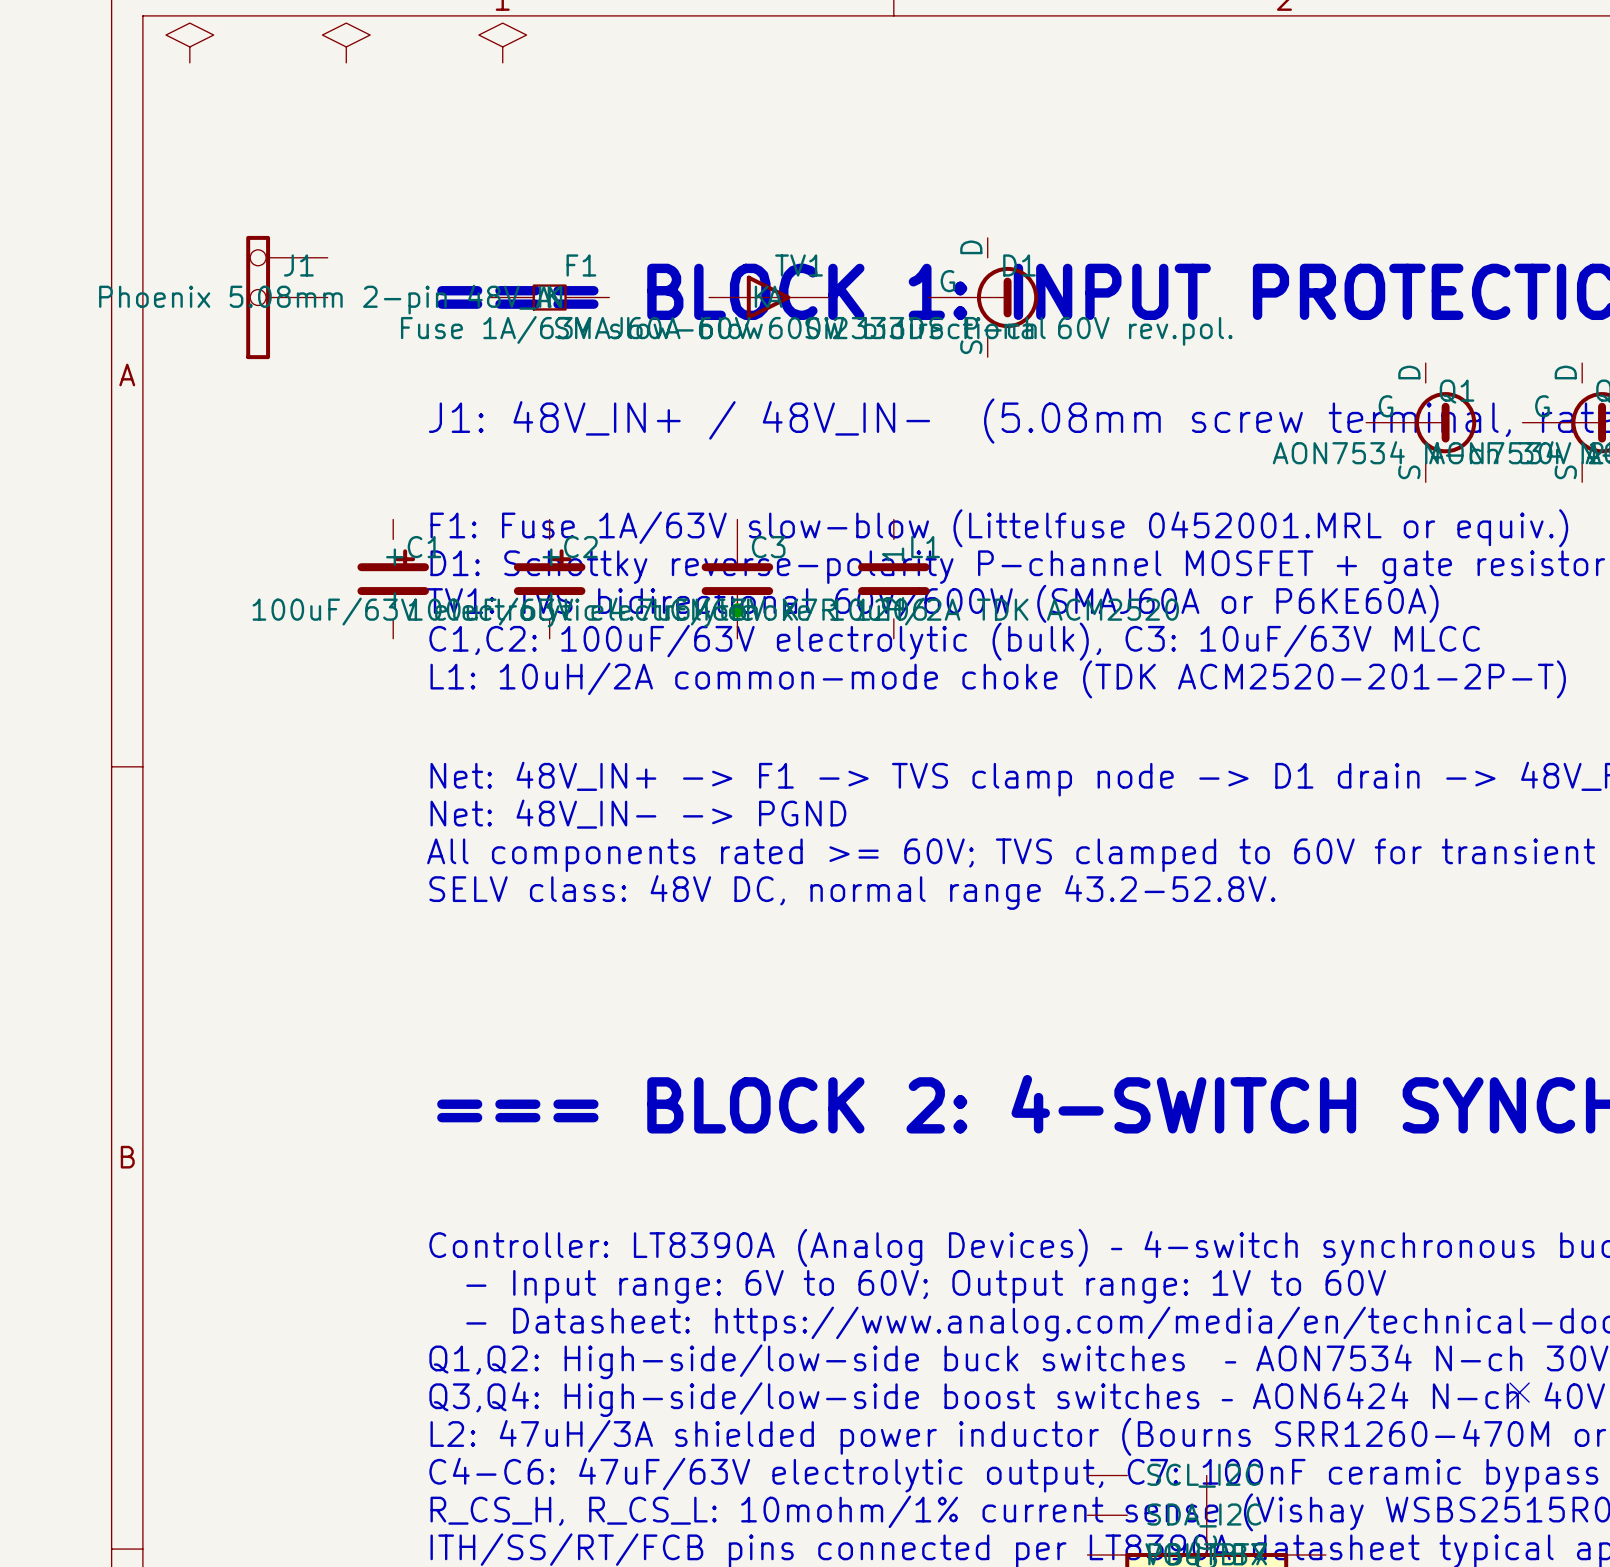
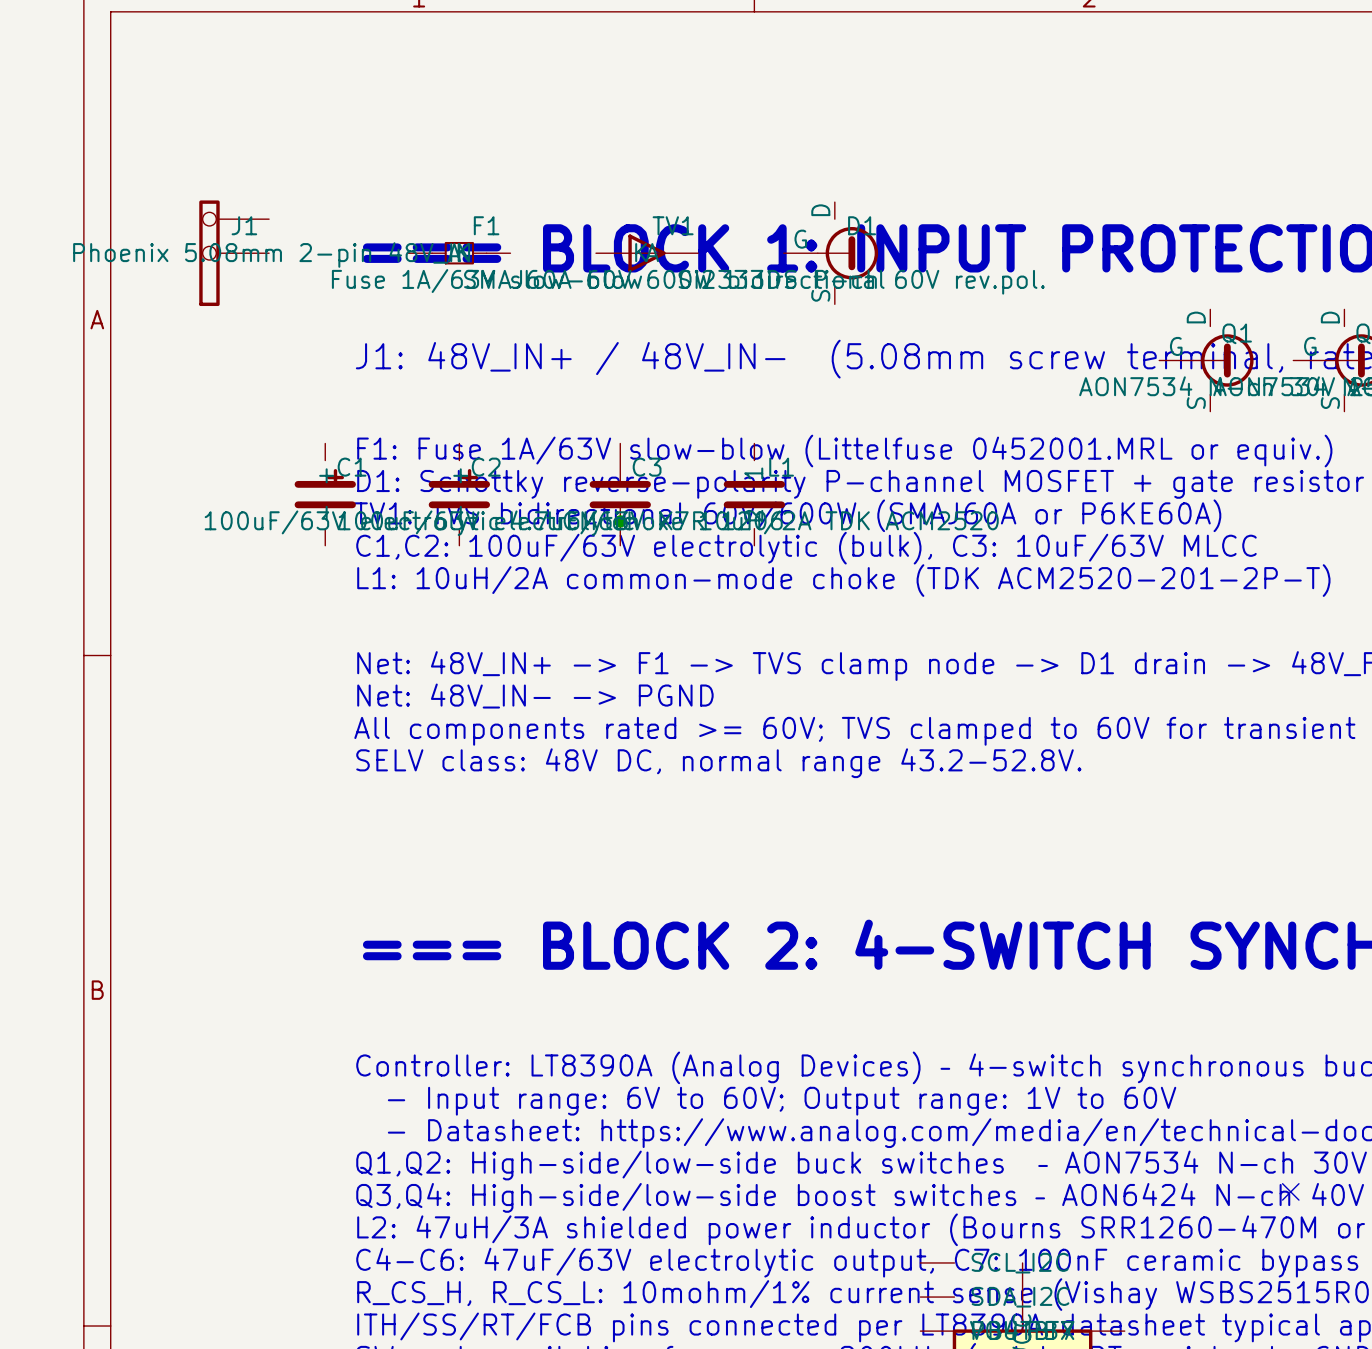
power symbol: (189, 42) -> none
power symbol: (346, 42) -> none
power symbol: (502, 42) -> none

